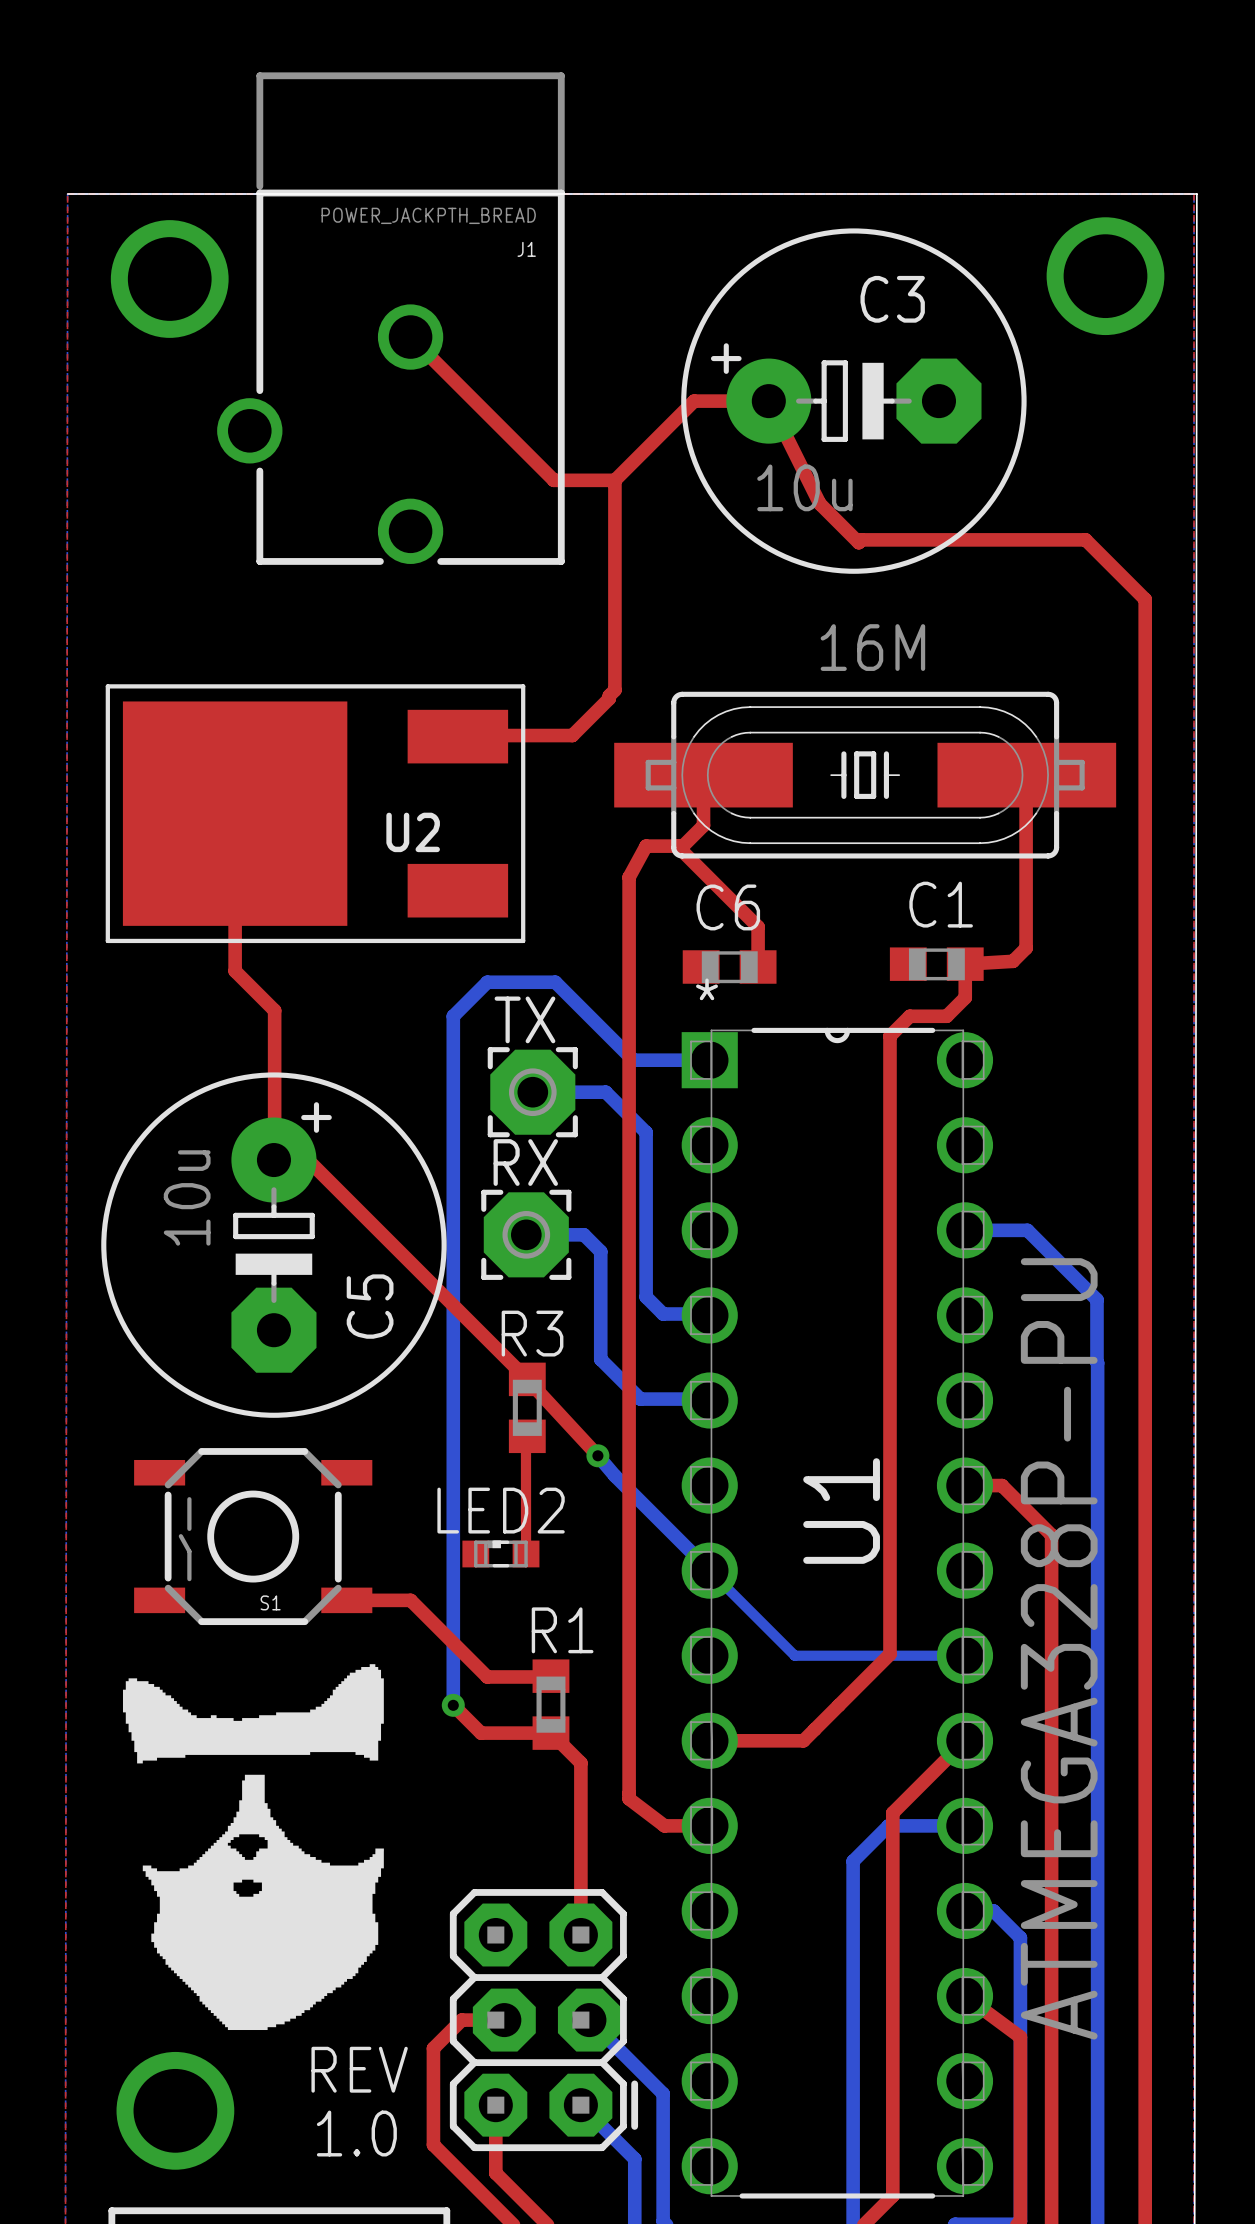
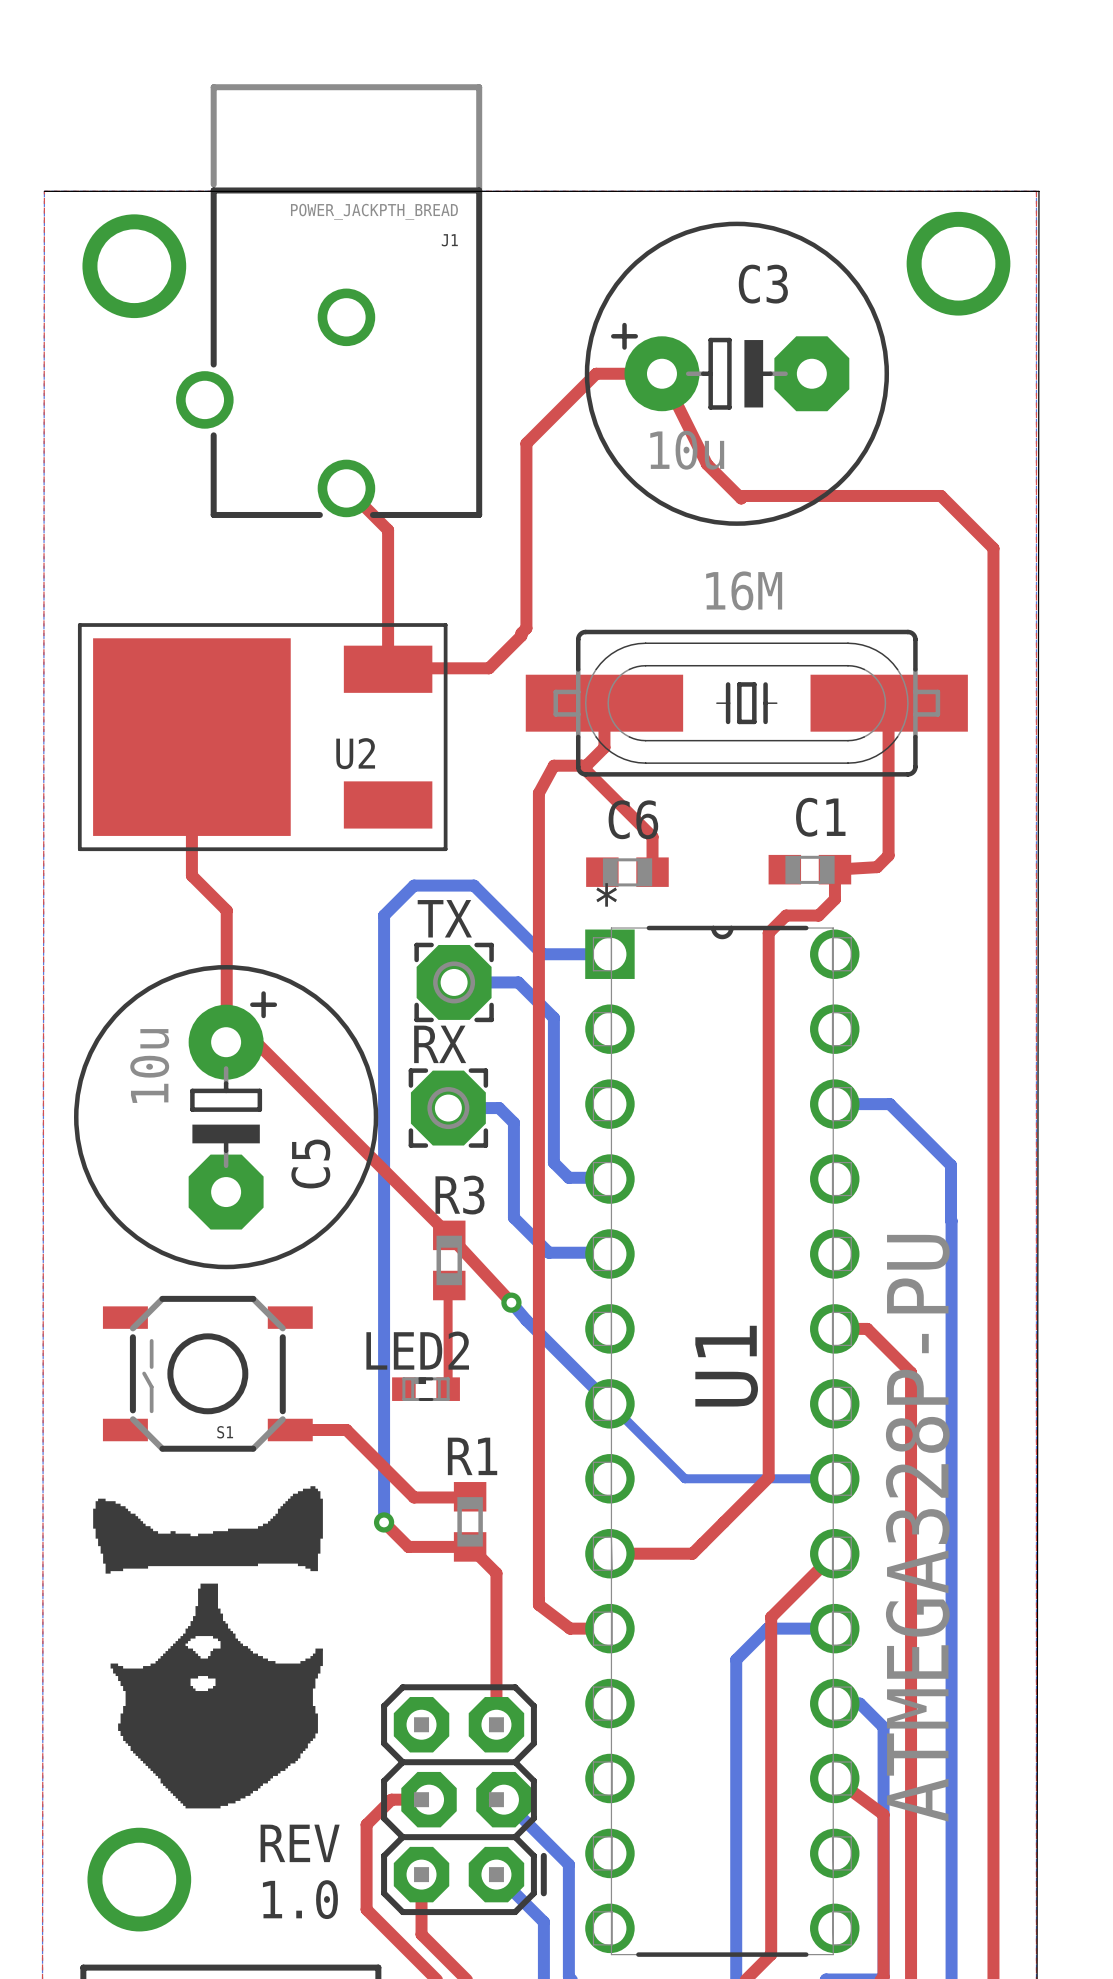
top track: (410, 337) (553, 480) (614, 480) -> none
top track: none -> (346, 488) (388, 530) (388, 669)

